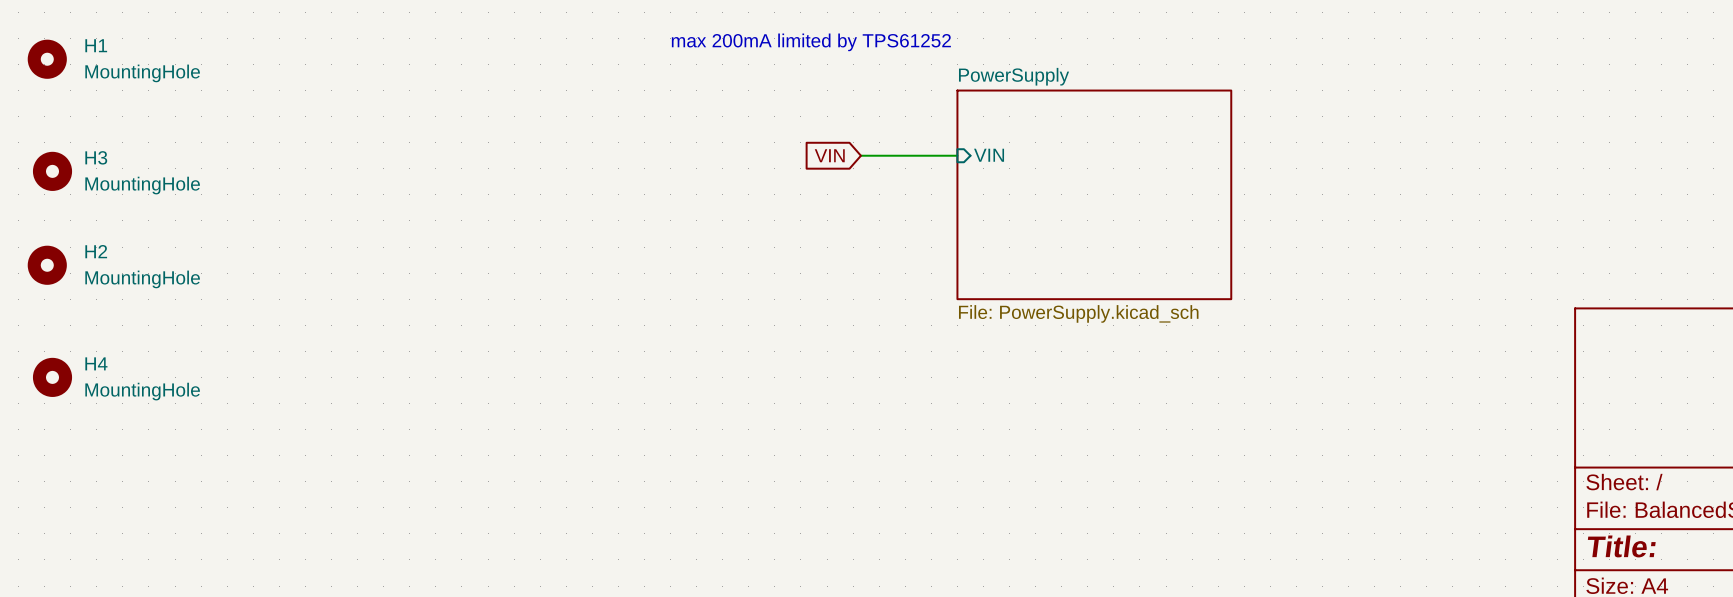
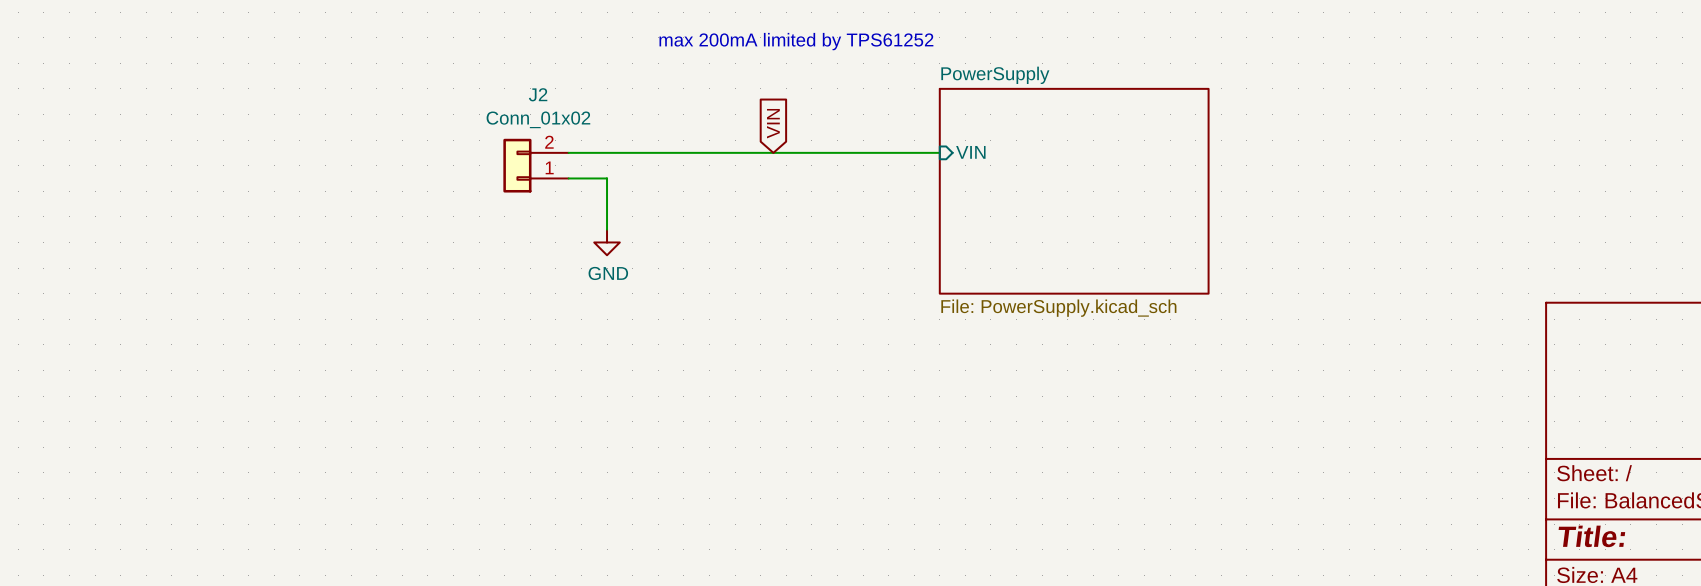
H1: MountingHole (47, 59) -> none
wire: none -> (568, 152) (845, 152)
global label rotation: 0° (829, 155) -> 90° clockwise (773, 123)
J2: none -> Conn_01x02 (535, 165)
H3: MountingHole (52, 171) -> none
wire: none -> (568, 178) (607, 178) (607, 229)
power symbol: none -> GND (607, 242)
H2: MountingHole (47, 265) -> none
H4: MountingHole (52, 377) -> none

